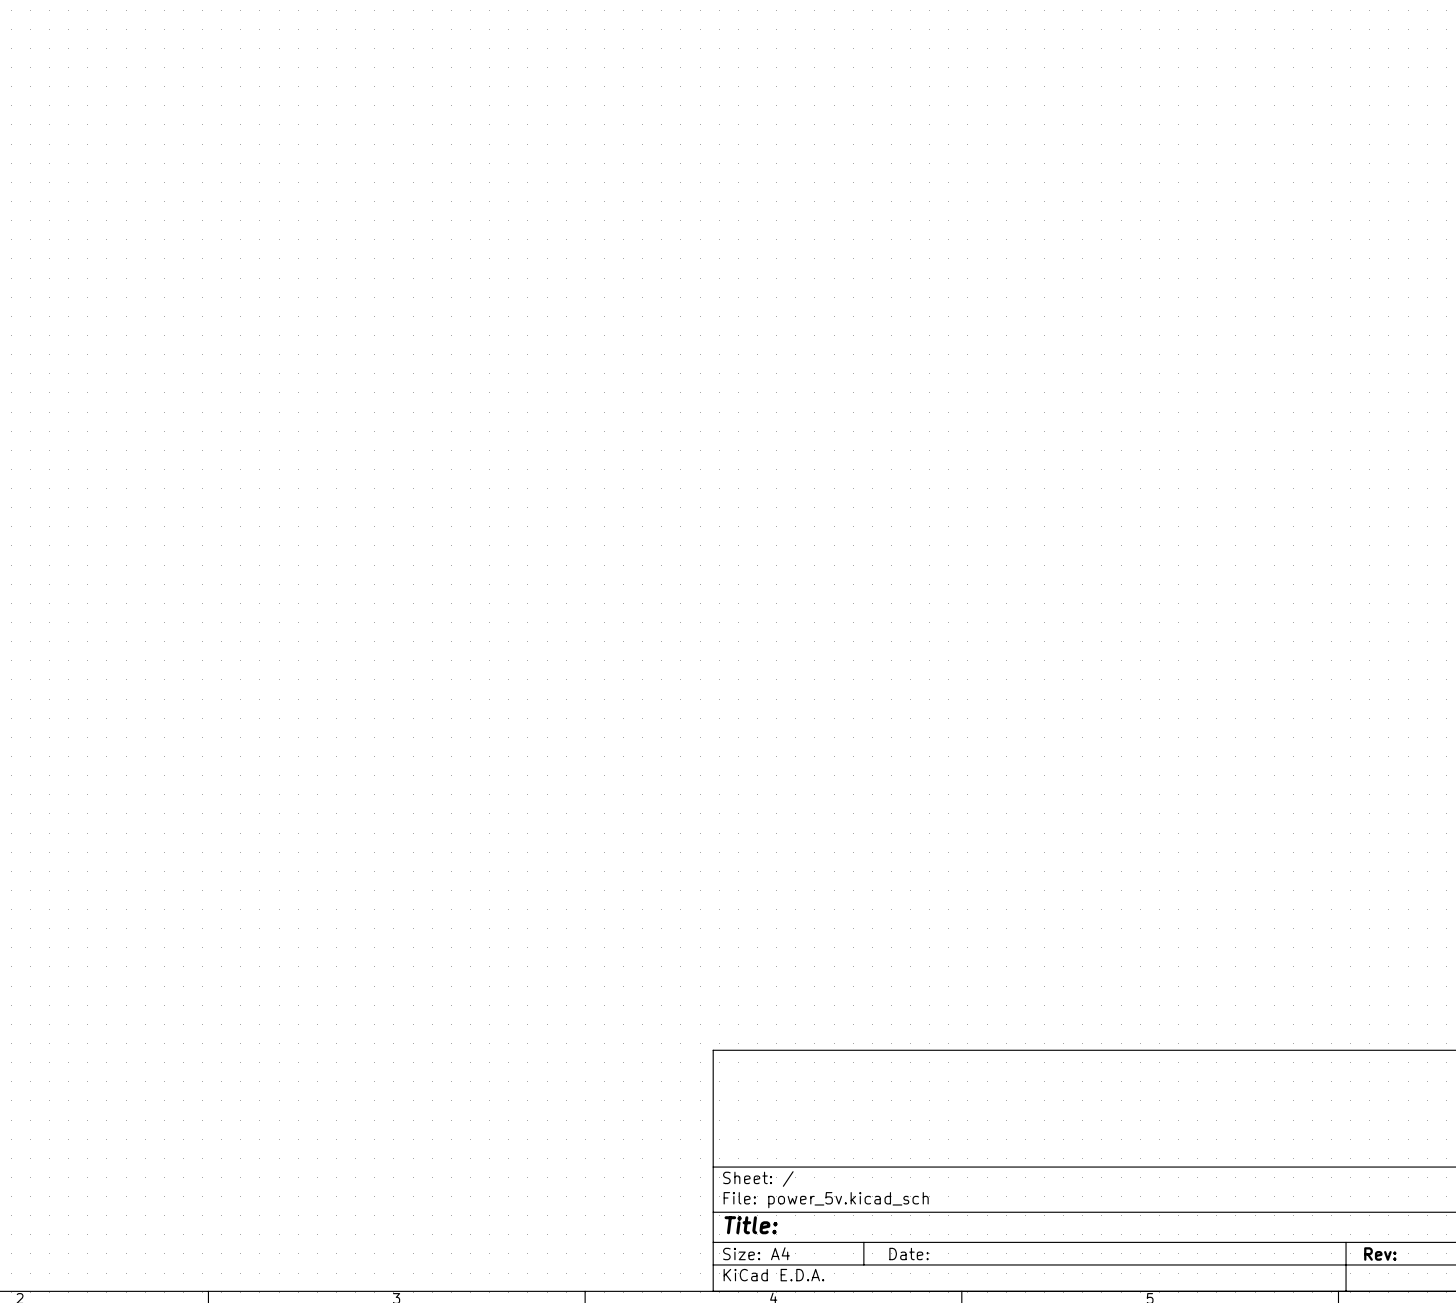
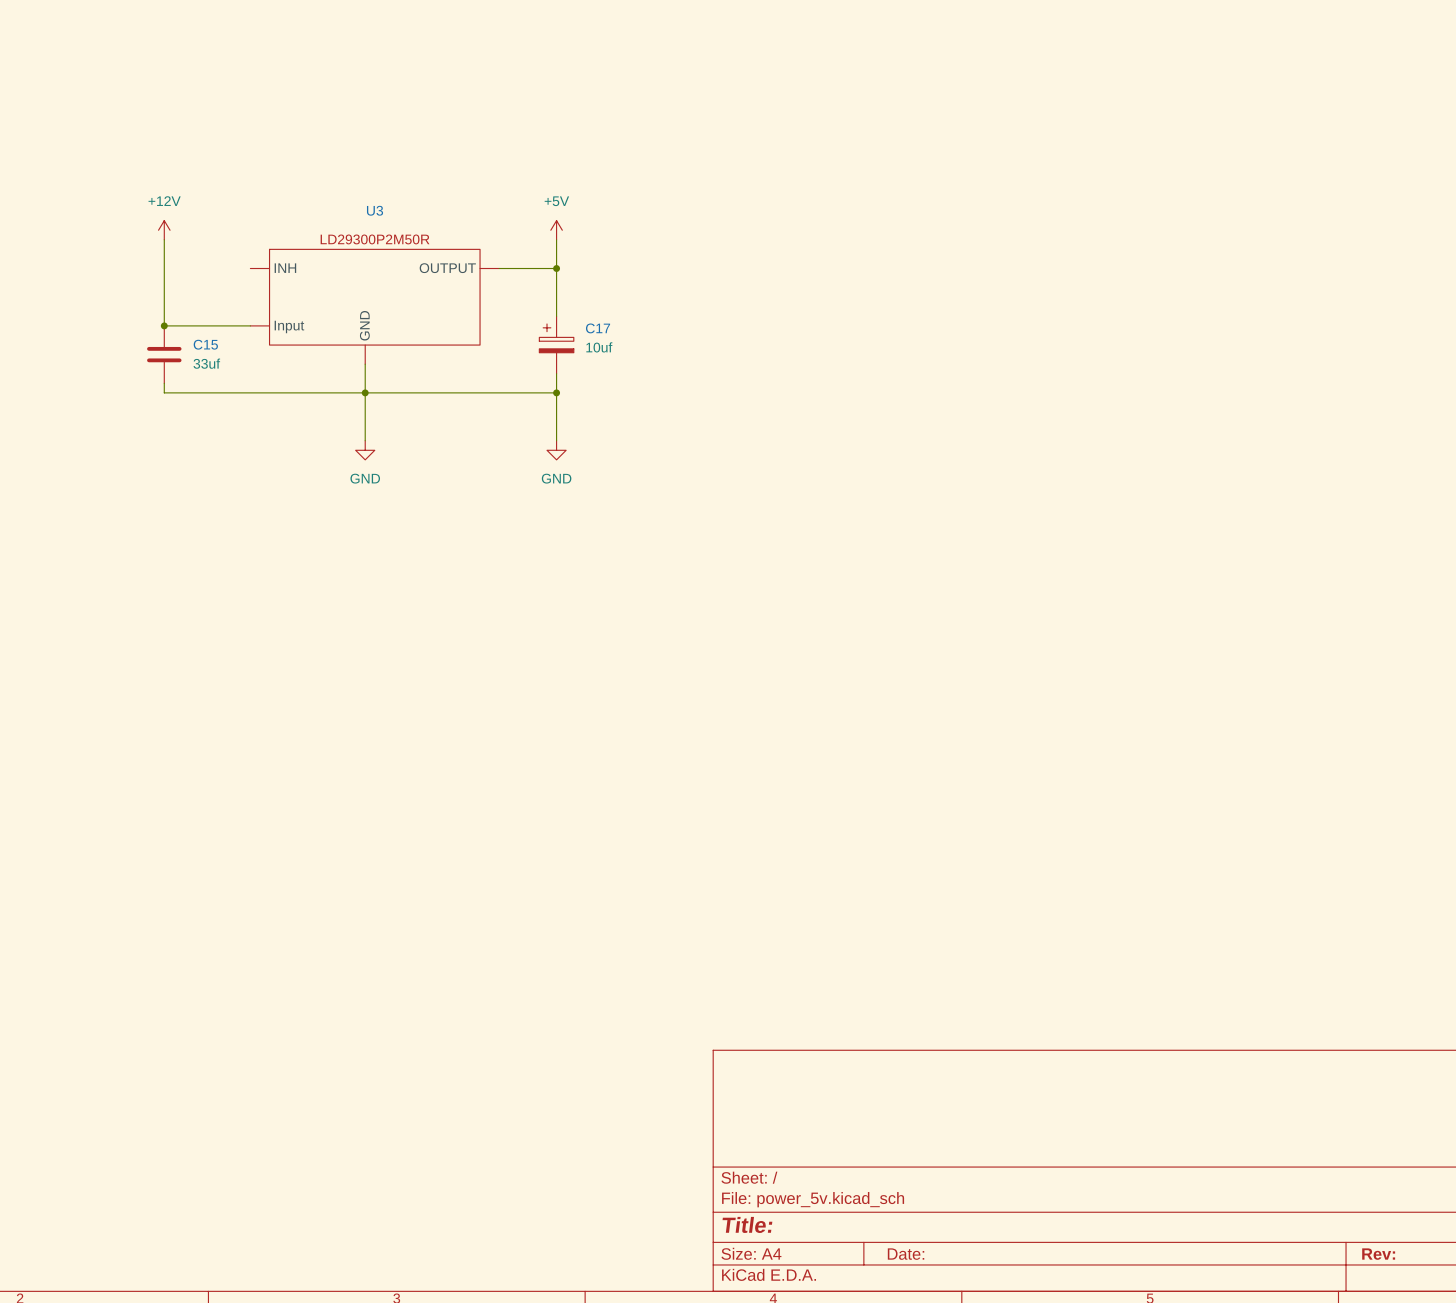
power symbol: none -> +12V (164, 230)
power symbol: none -> +5V (556, 230)
wire: none -> (164, 239) (164, 325) (250, 325)
wire: none -> (556, 239) (556, 316)
wire: none -> (499, 268) (556, 268)
junction: none -> (556, 268)
U3: none -> (374, 306)
junction: none -> (164, 325)
C17: none -> 10uf (556, 345)
C15: none -> 33uf (164, 354)
wire: none -> (365, 364) (365, 440)
wire: none -> (556, 373) (556, 440)
wire: none -> (164, 383) (164, 392) (556, 392)
junction: none -> (365, 392)
junction: none -> (556, 392)
power symbol: none -> GND (365, 450)
power symbol: none -> GND (556, 450)

